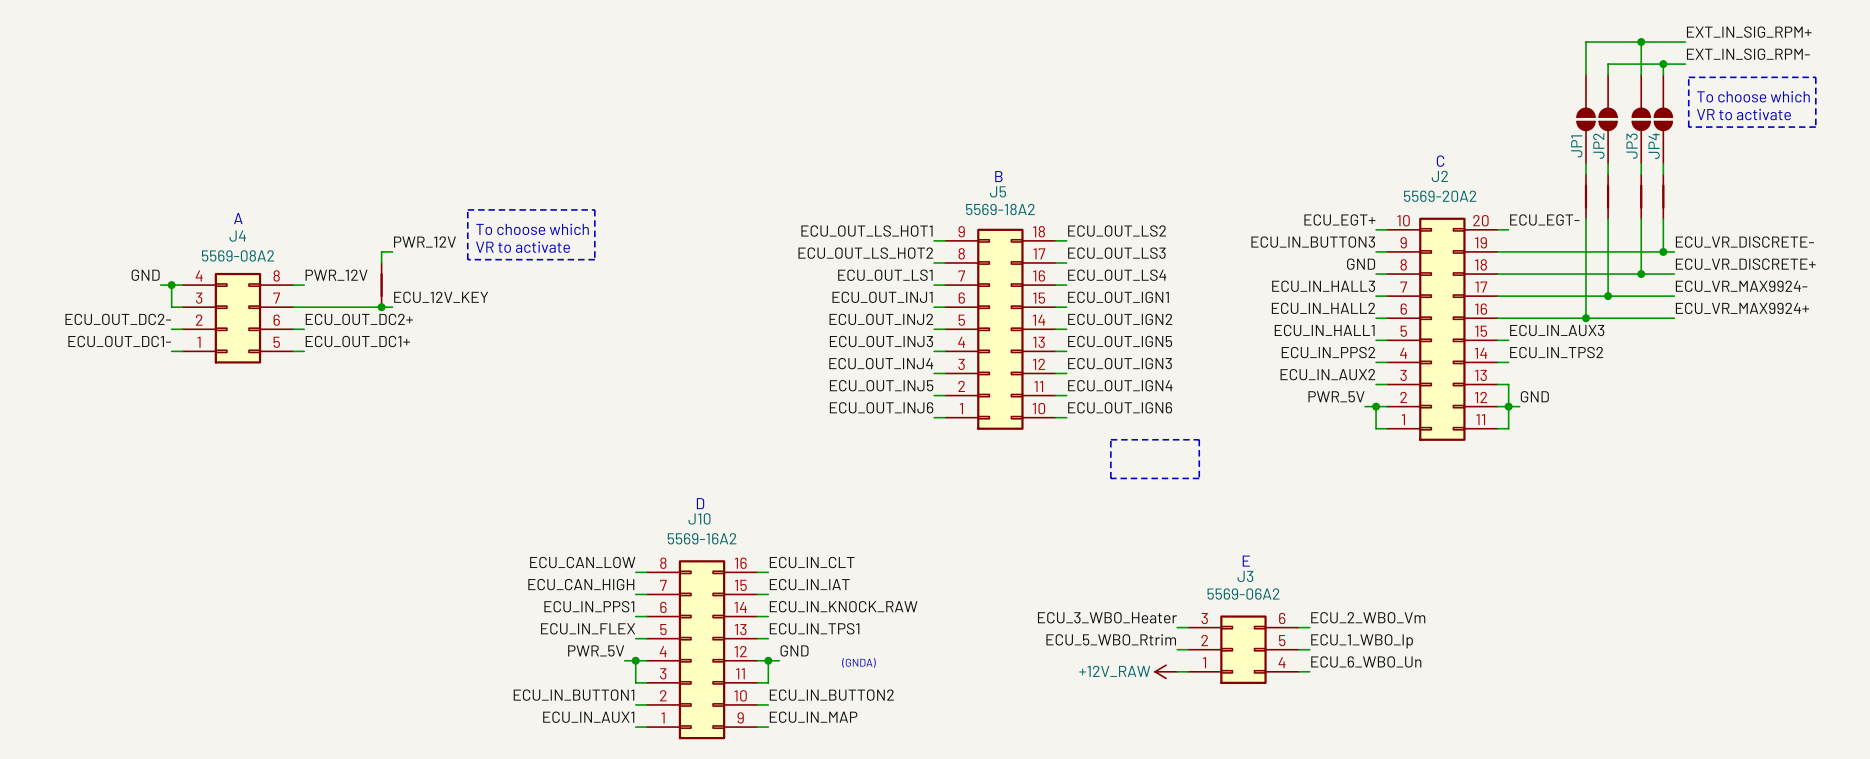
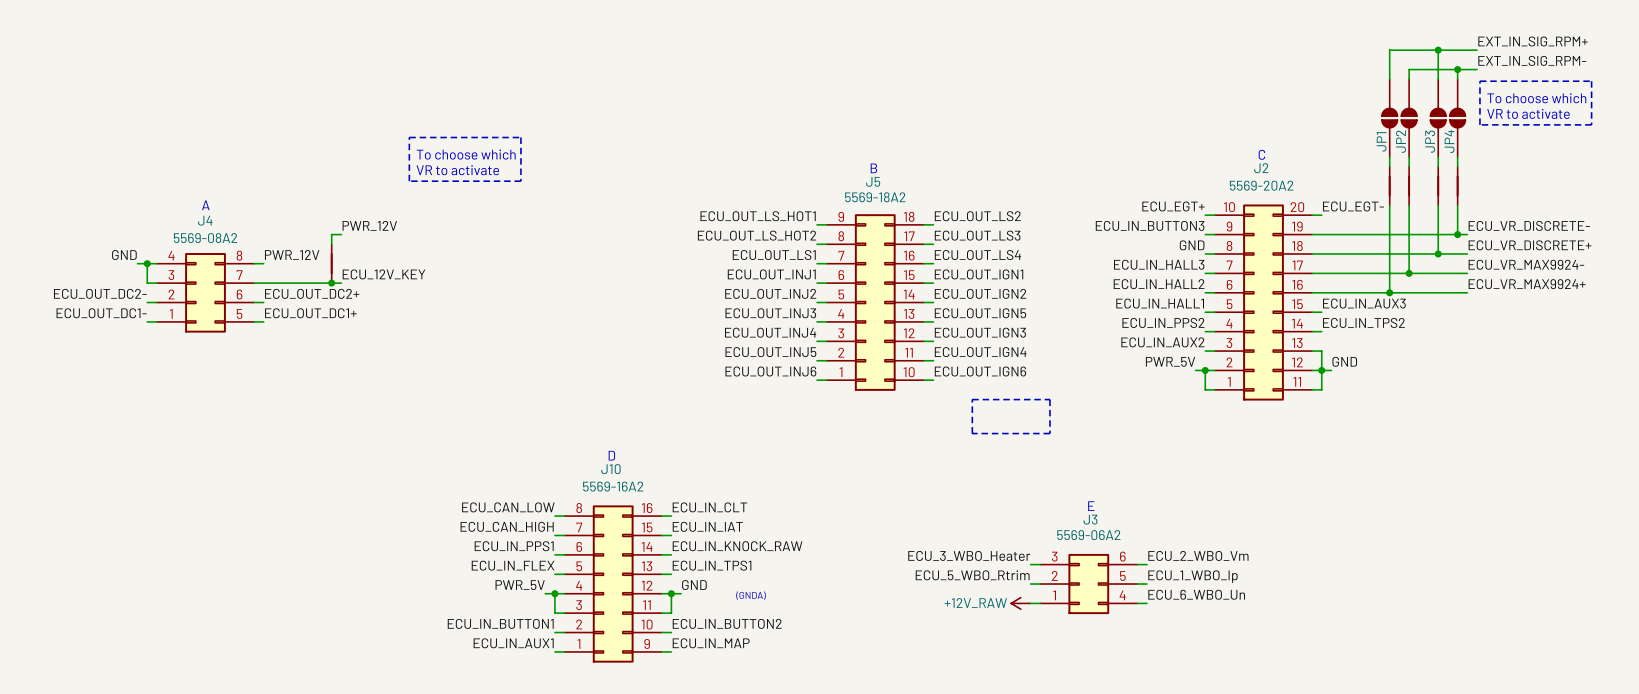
line: (467, 209) (594, 209) (594, 259) (467, 259) (467, 209) -> (409, 137) (520, 137) (520, 181) (409, 181) (409, 137)
text position: To choose which (532, 229) -> To choose which (466, 154)
text position: VR to activate (523, 247) -> VR to activate (457, 170)

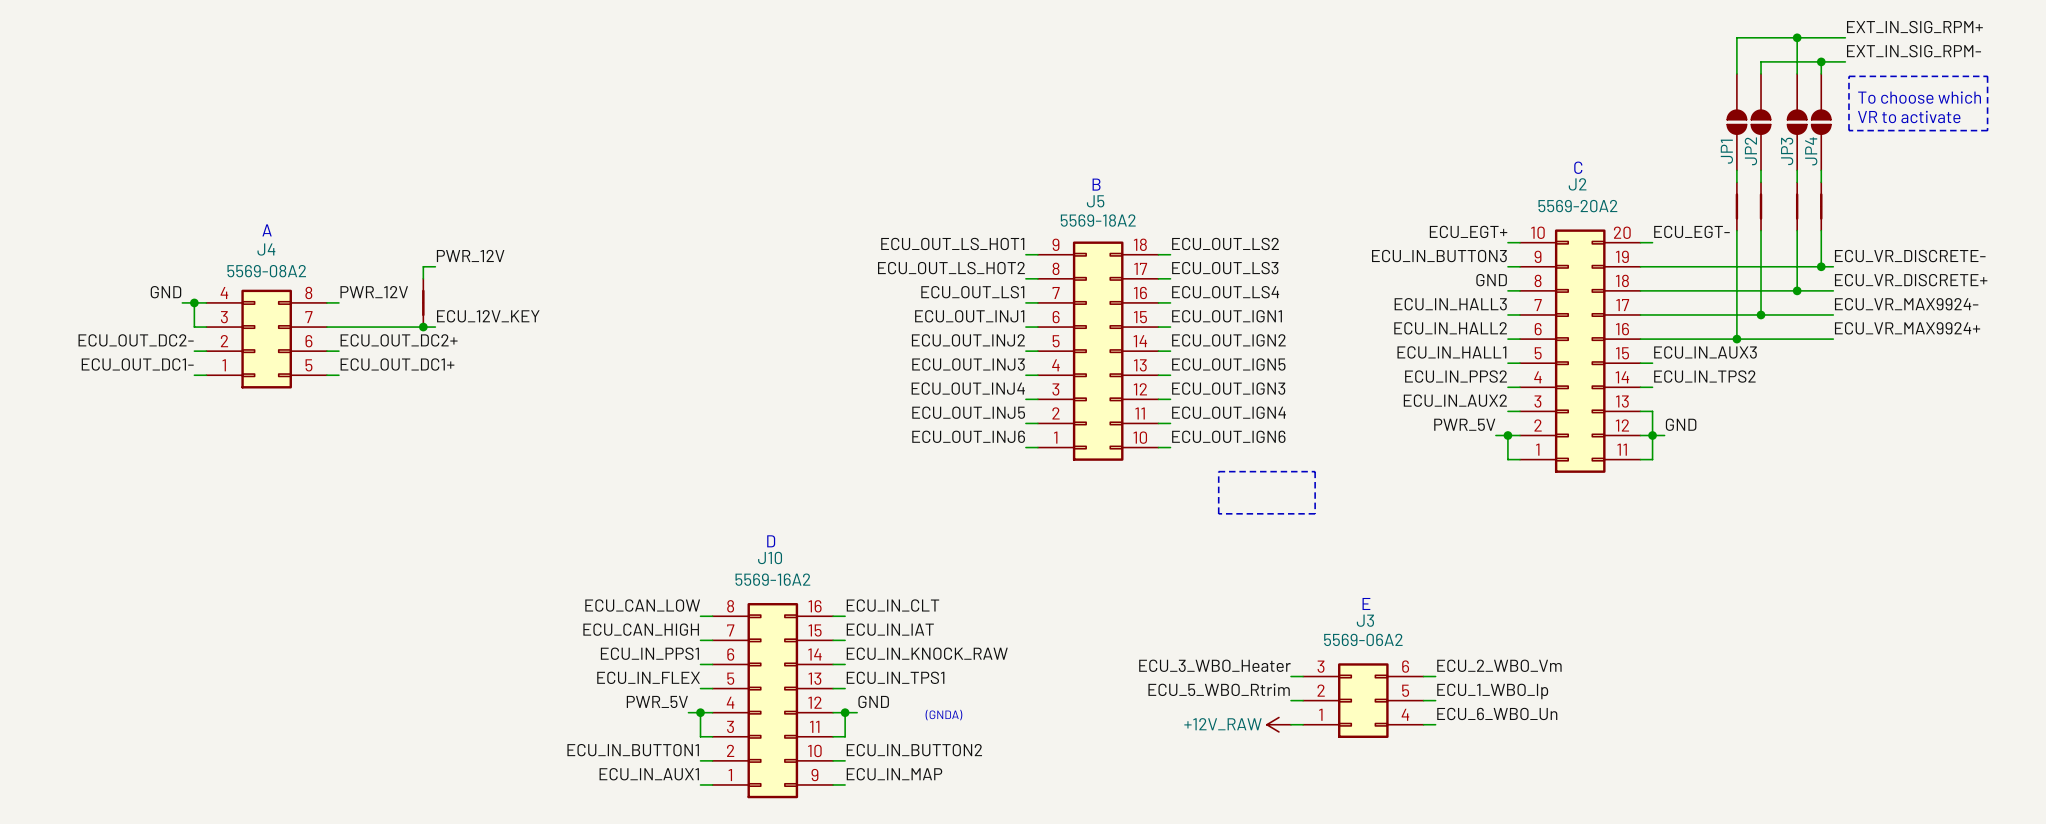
line: (409, 137) (520, 137) (520, 181) (409, 181) (409, 137) -> none
text: To choose which (466, 154) -> none
text: VR to activate (457, 170) -> none

